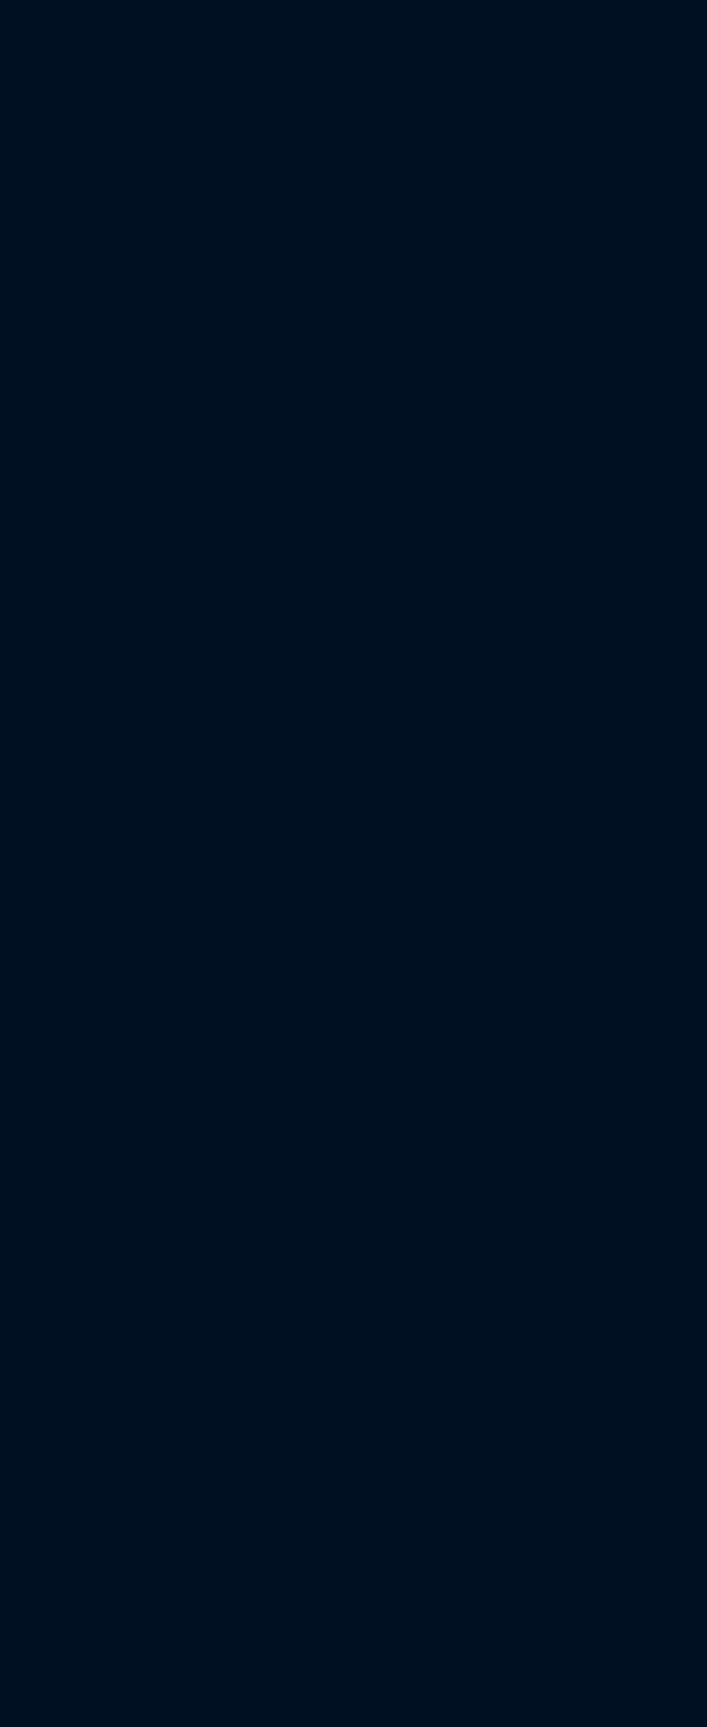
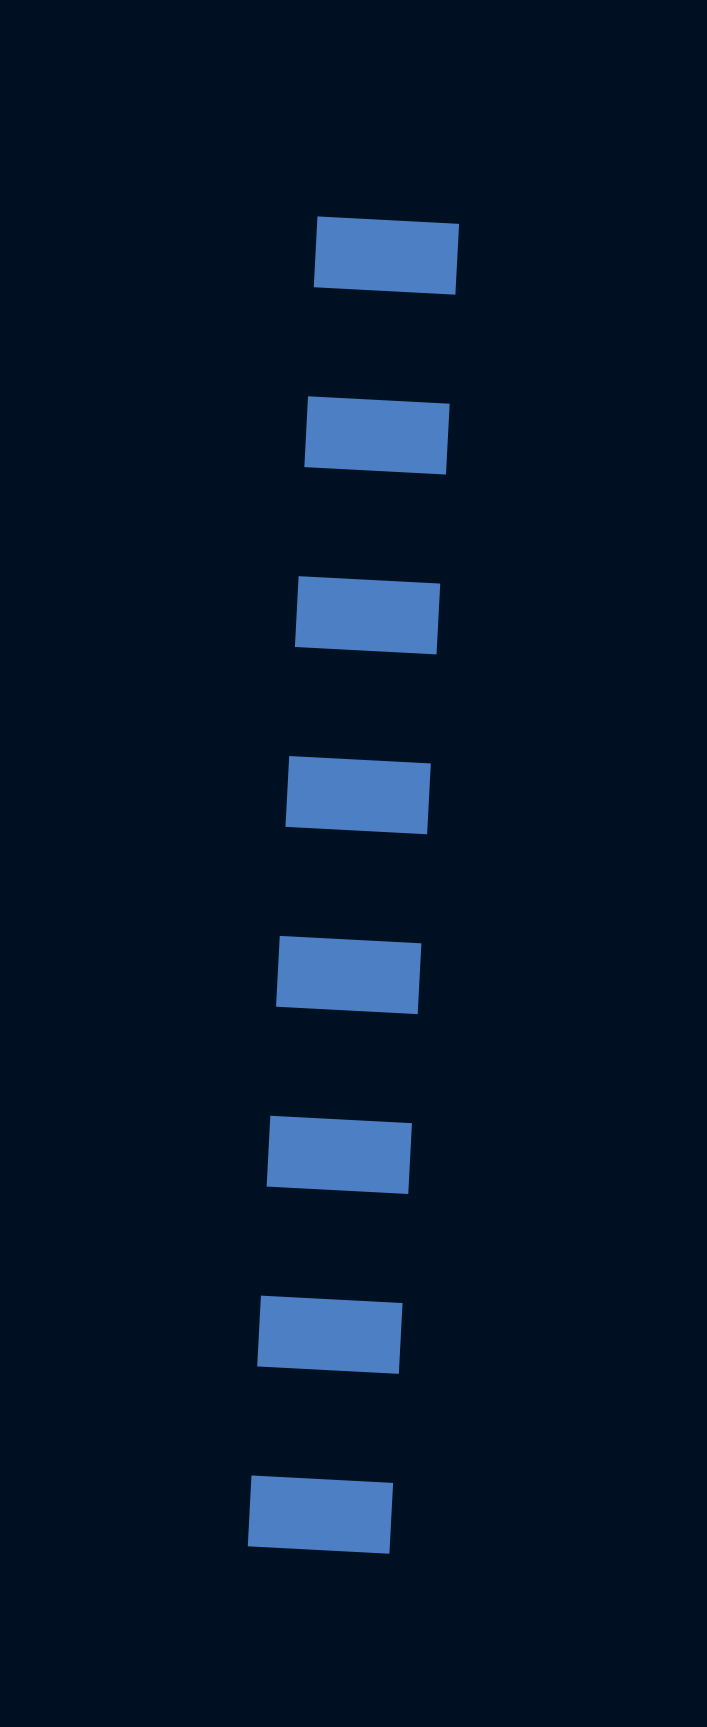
part: none -> (353, 885)

